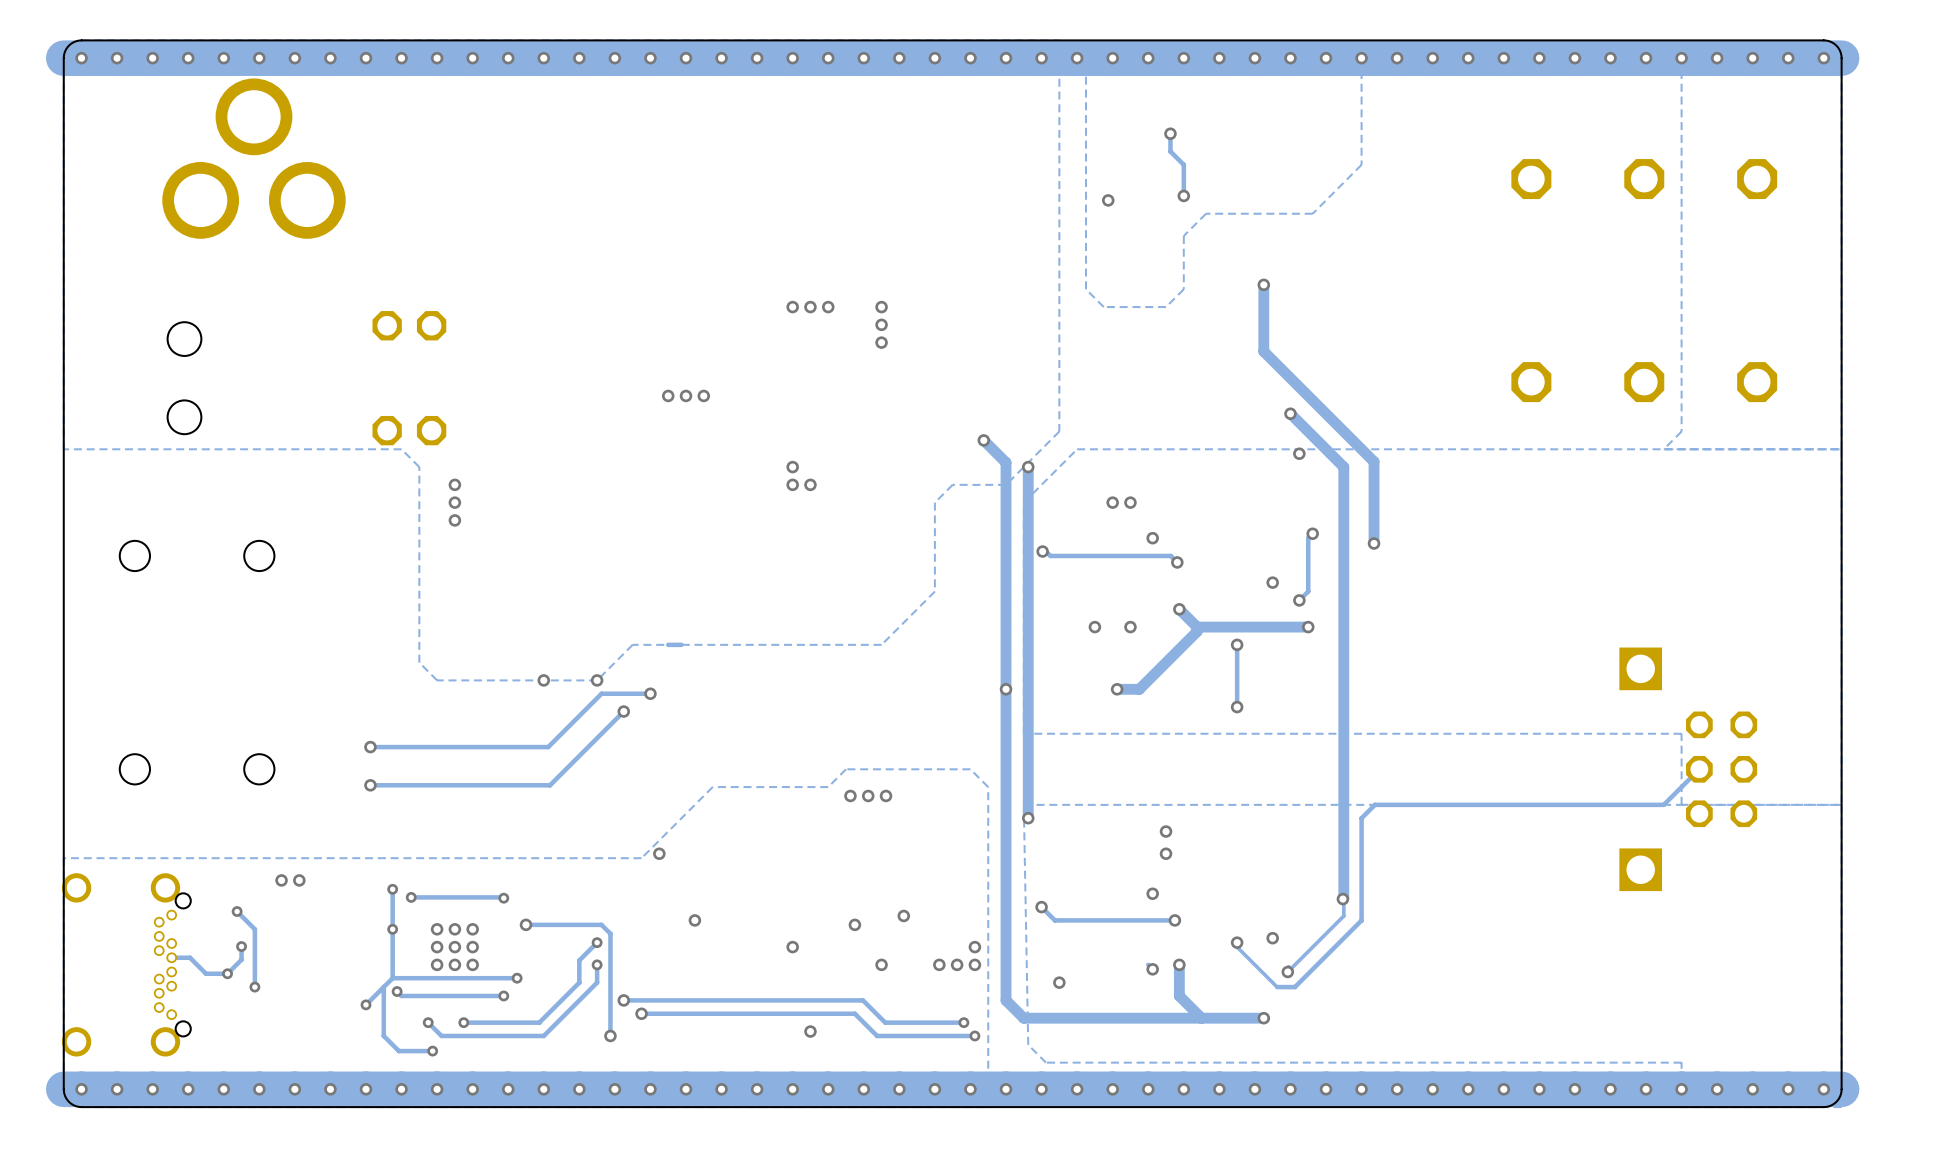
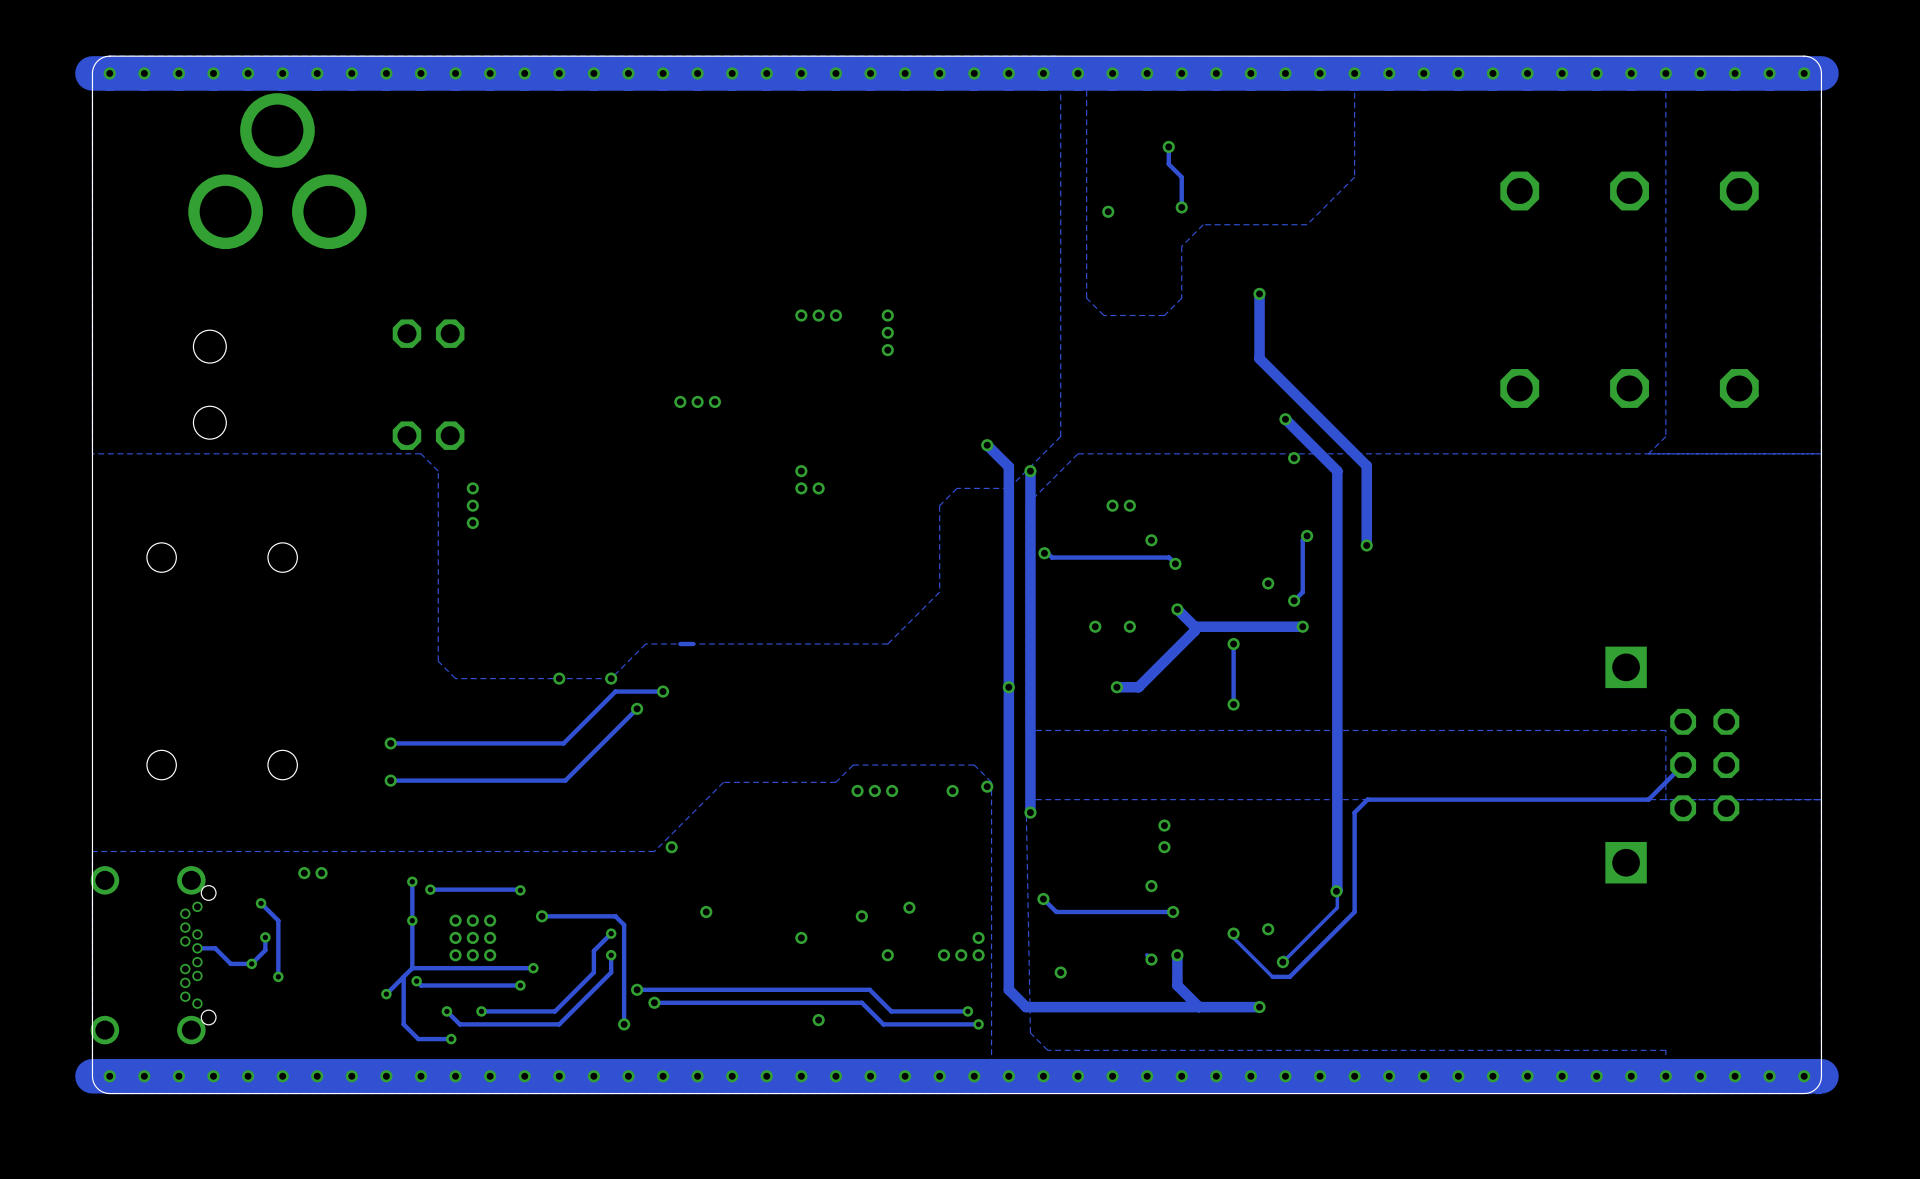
via: none -> (987, 786)
via: none -> (952, 790)

